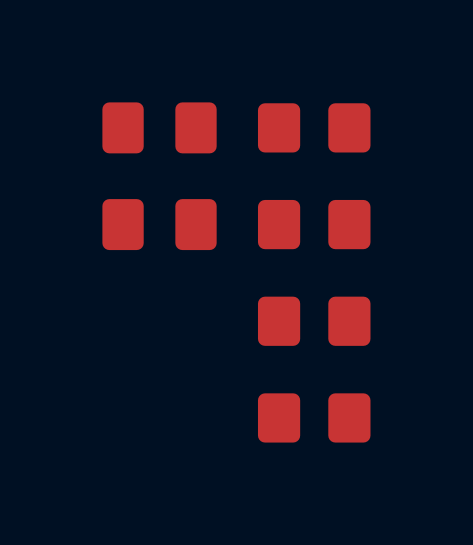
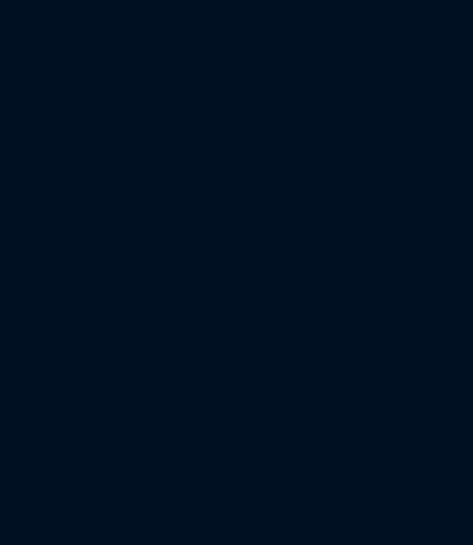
part: (159, 127) -> none
part: (314, 127) -> none
part: (159, 224) -> none
part: (314, 224) -> none
part: (314, 321) -> none
part: (314, 417) -> none

